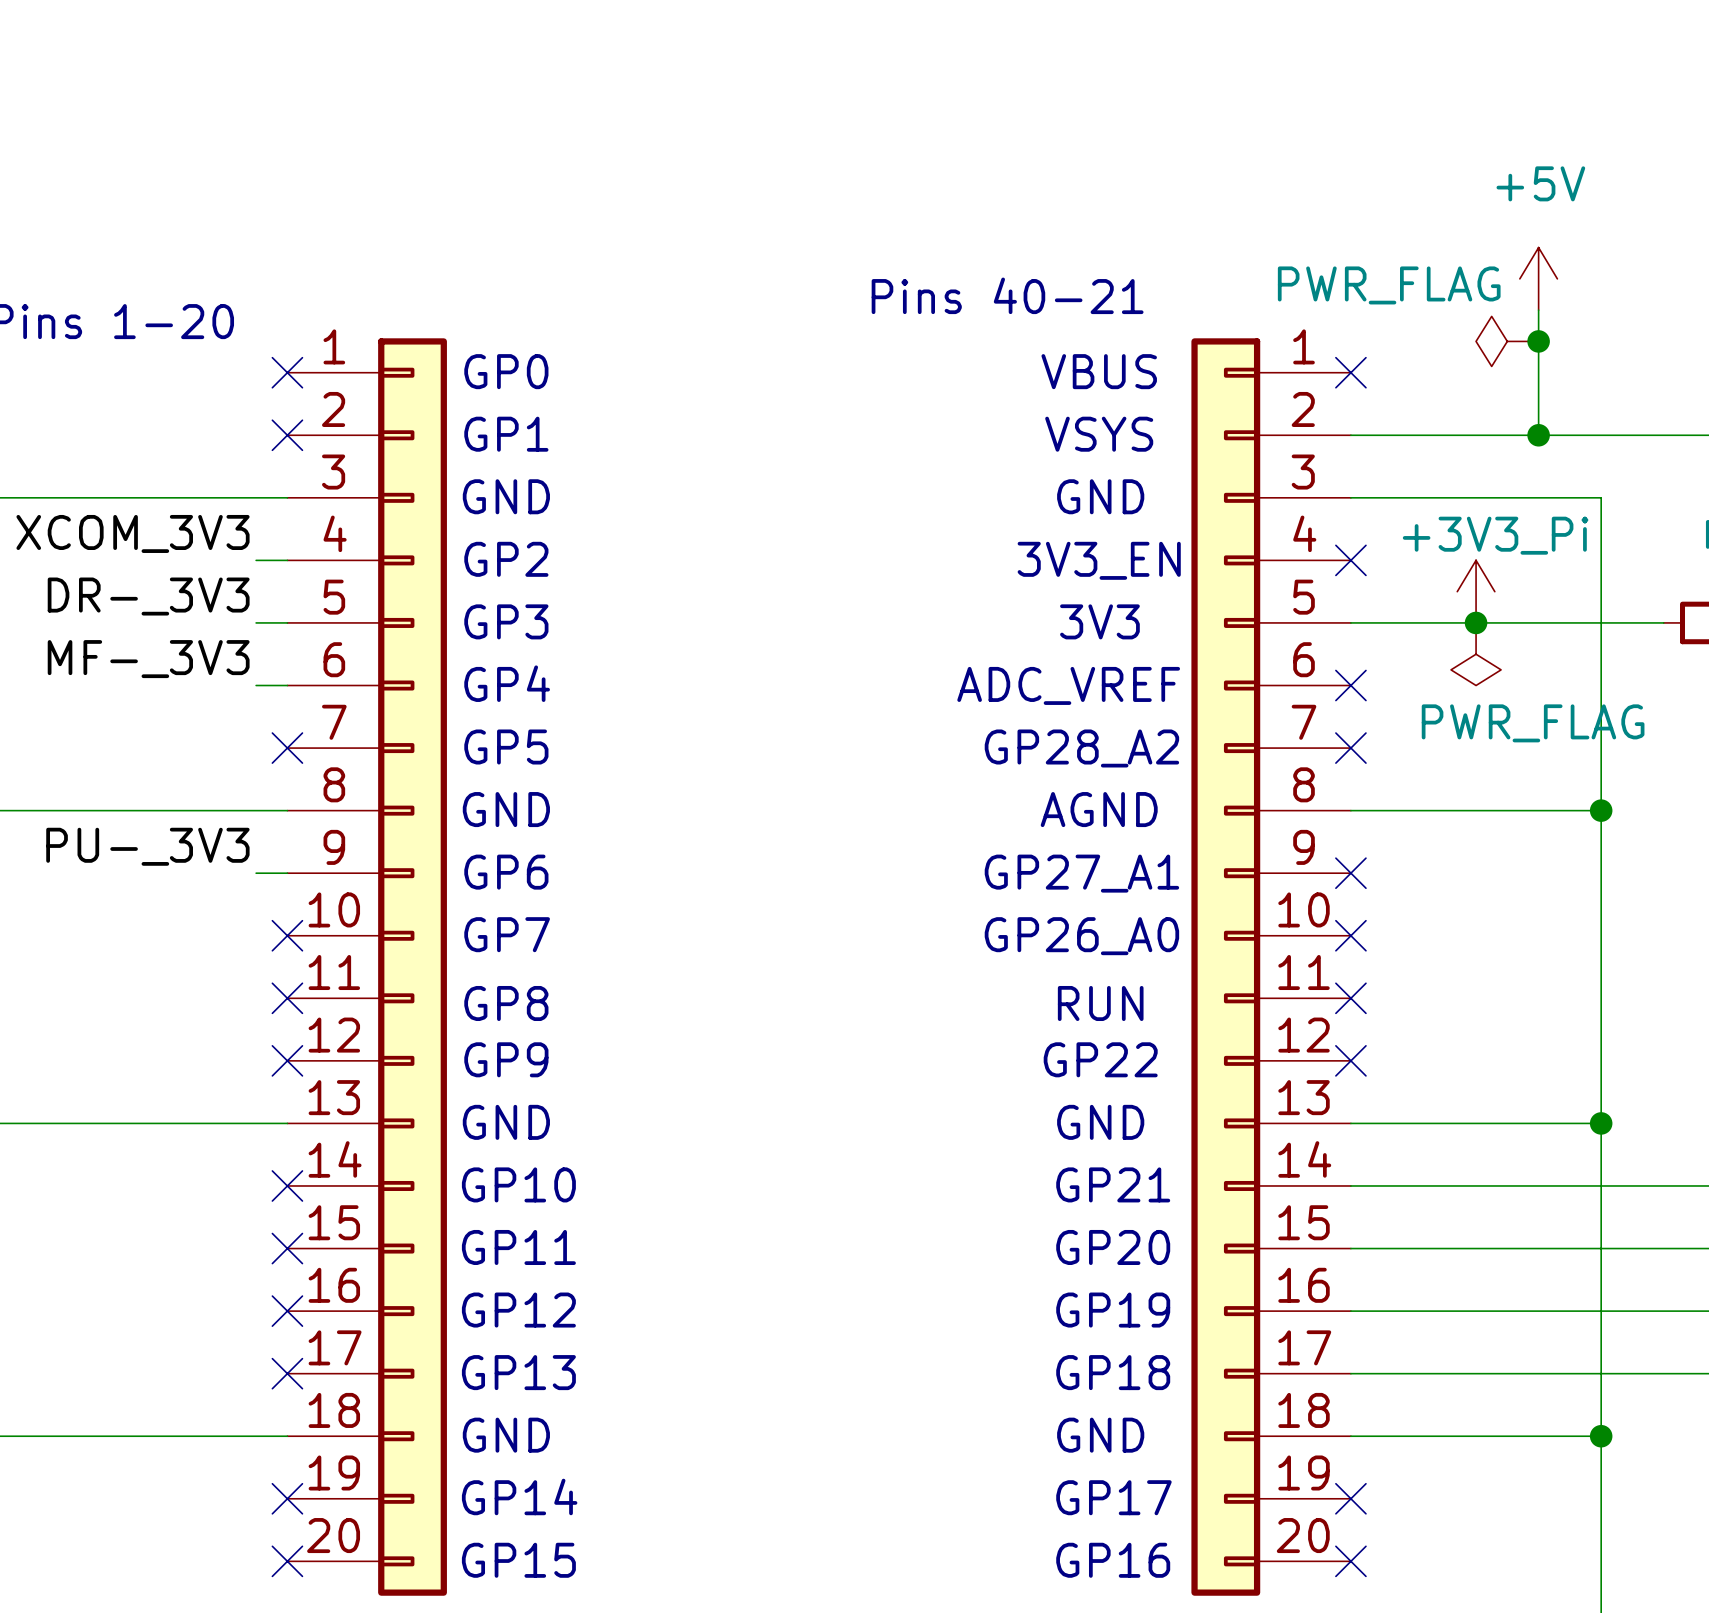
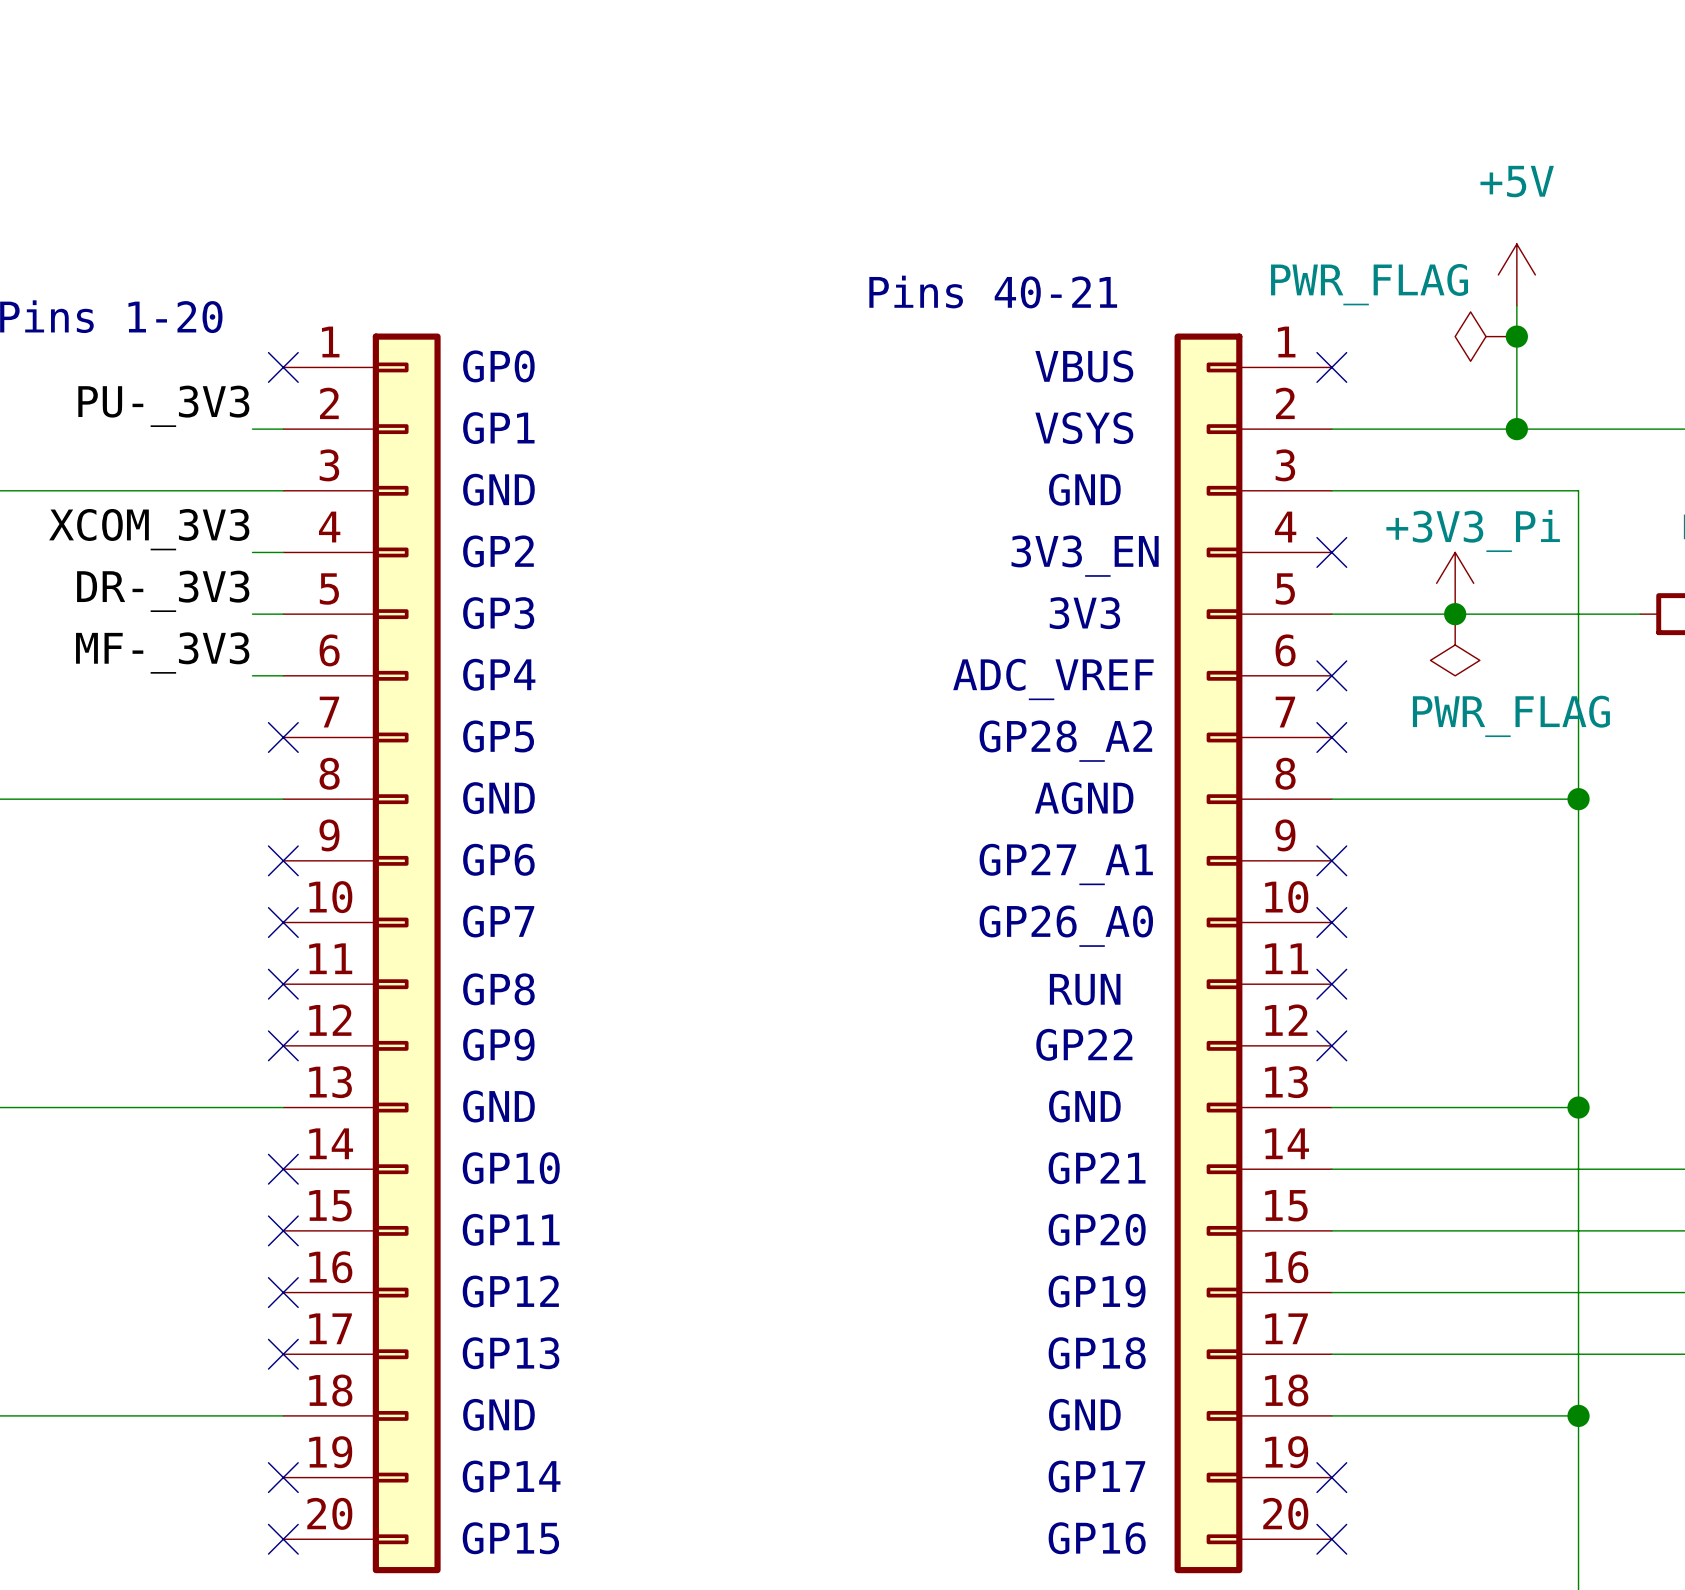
no-connect mark: (287, 435) -> none
label position: PU-_3V3 (147, 846) -> PU-_3V3 (163, 406)
wire: (256, 873) (287, 873) -> (252, 429) (283, 429)
no-connect mark: none -> (283, 860)

